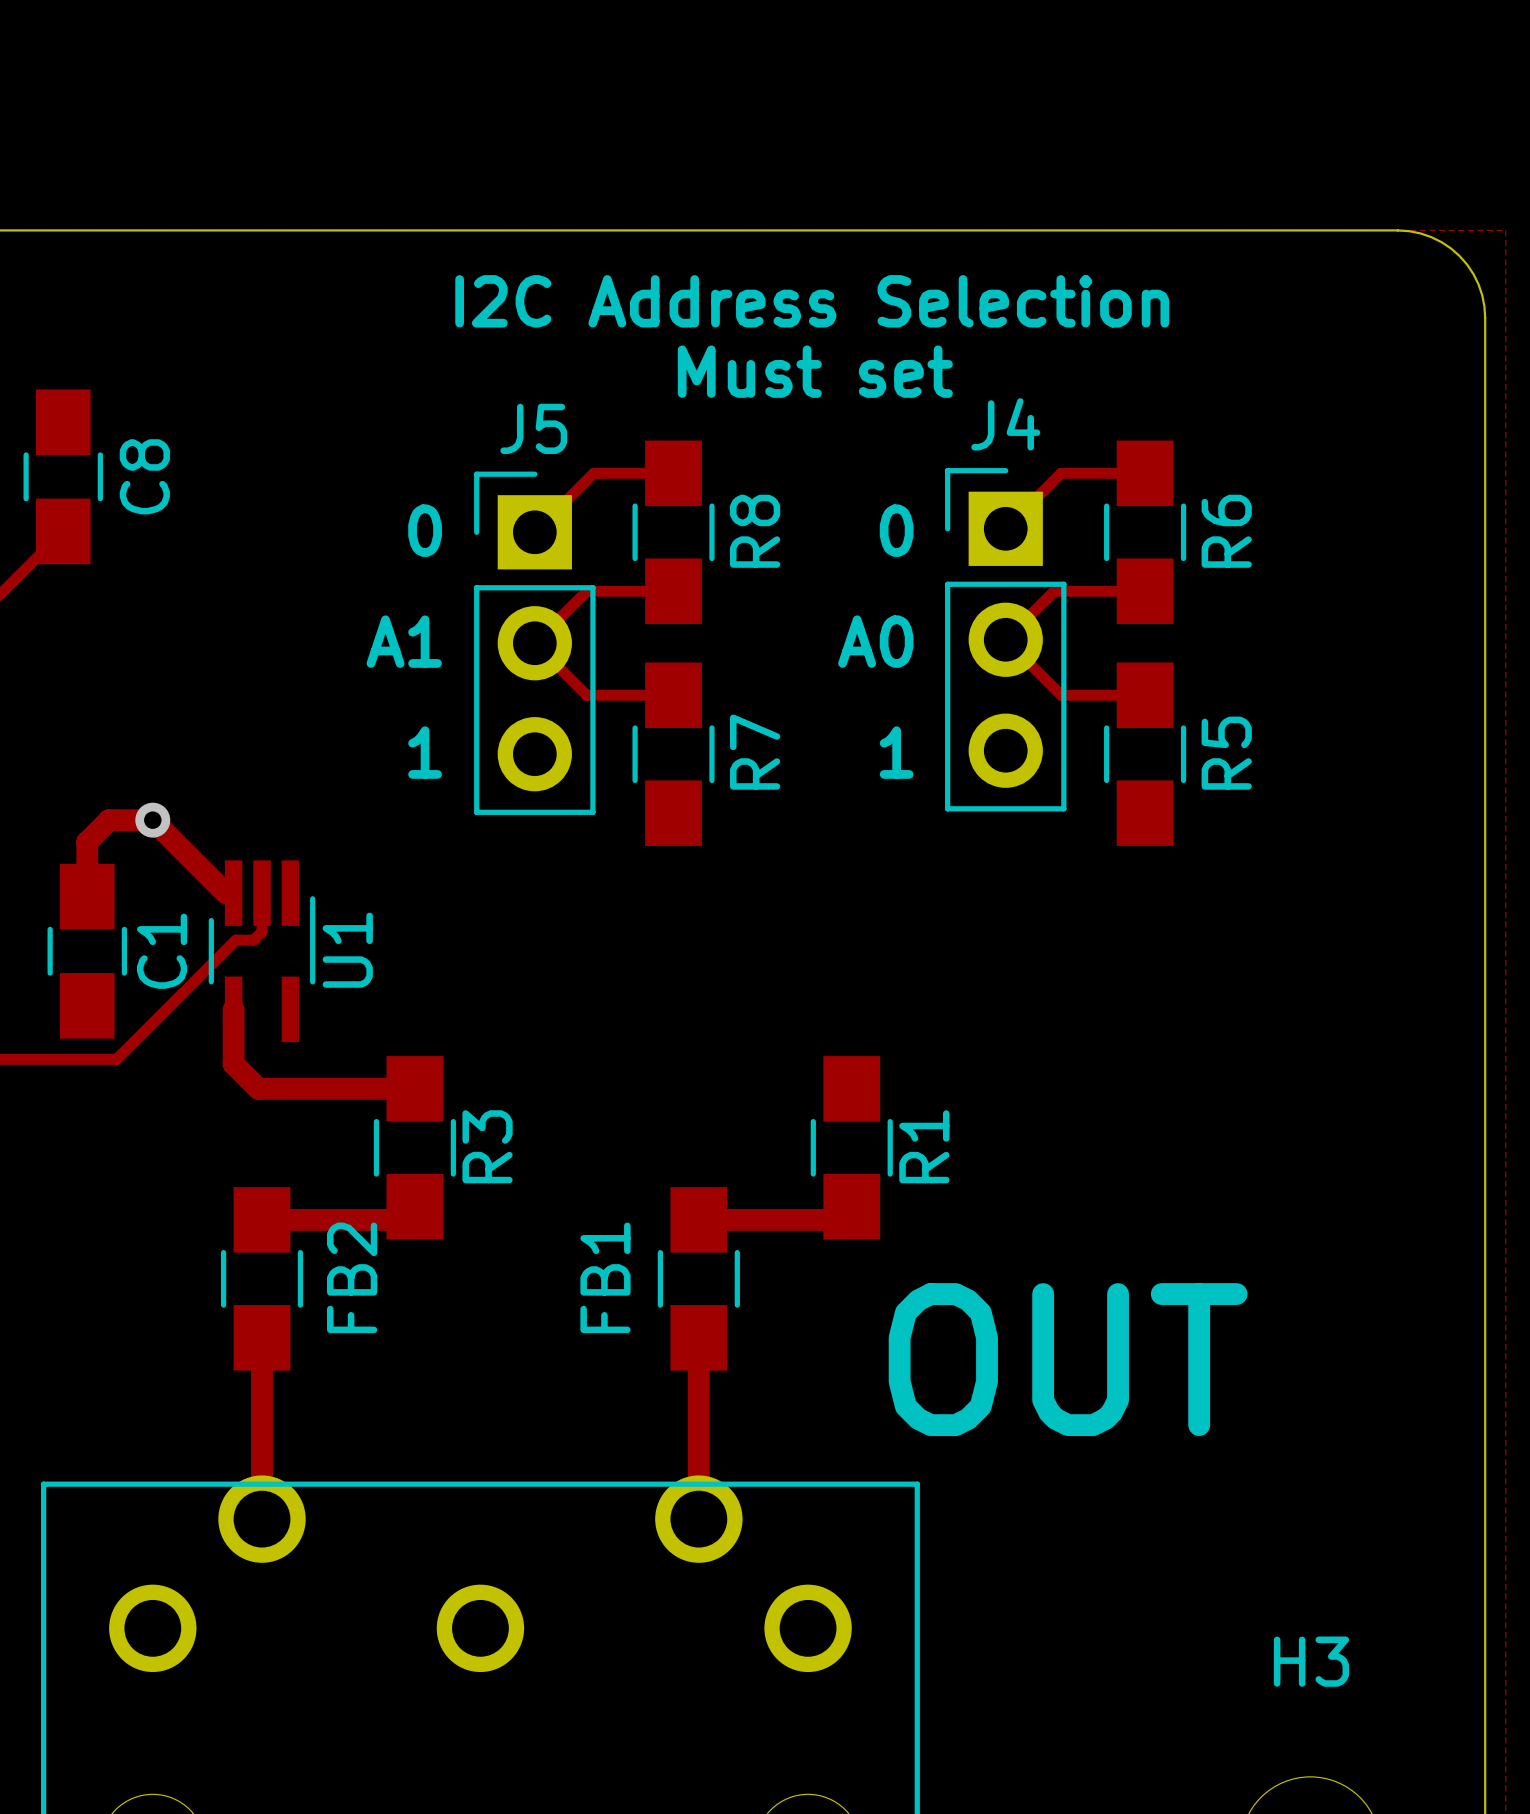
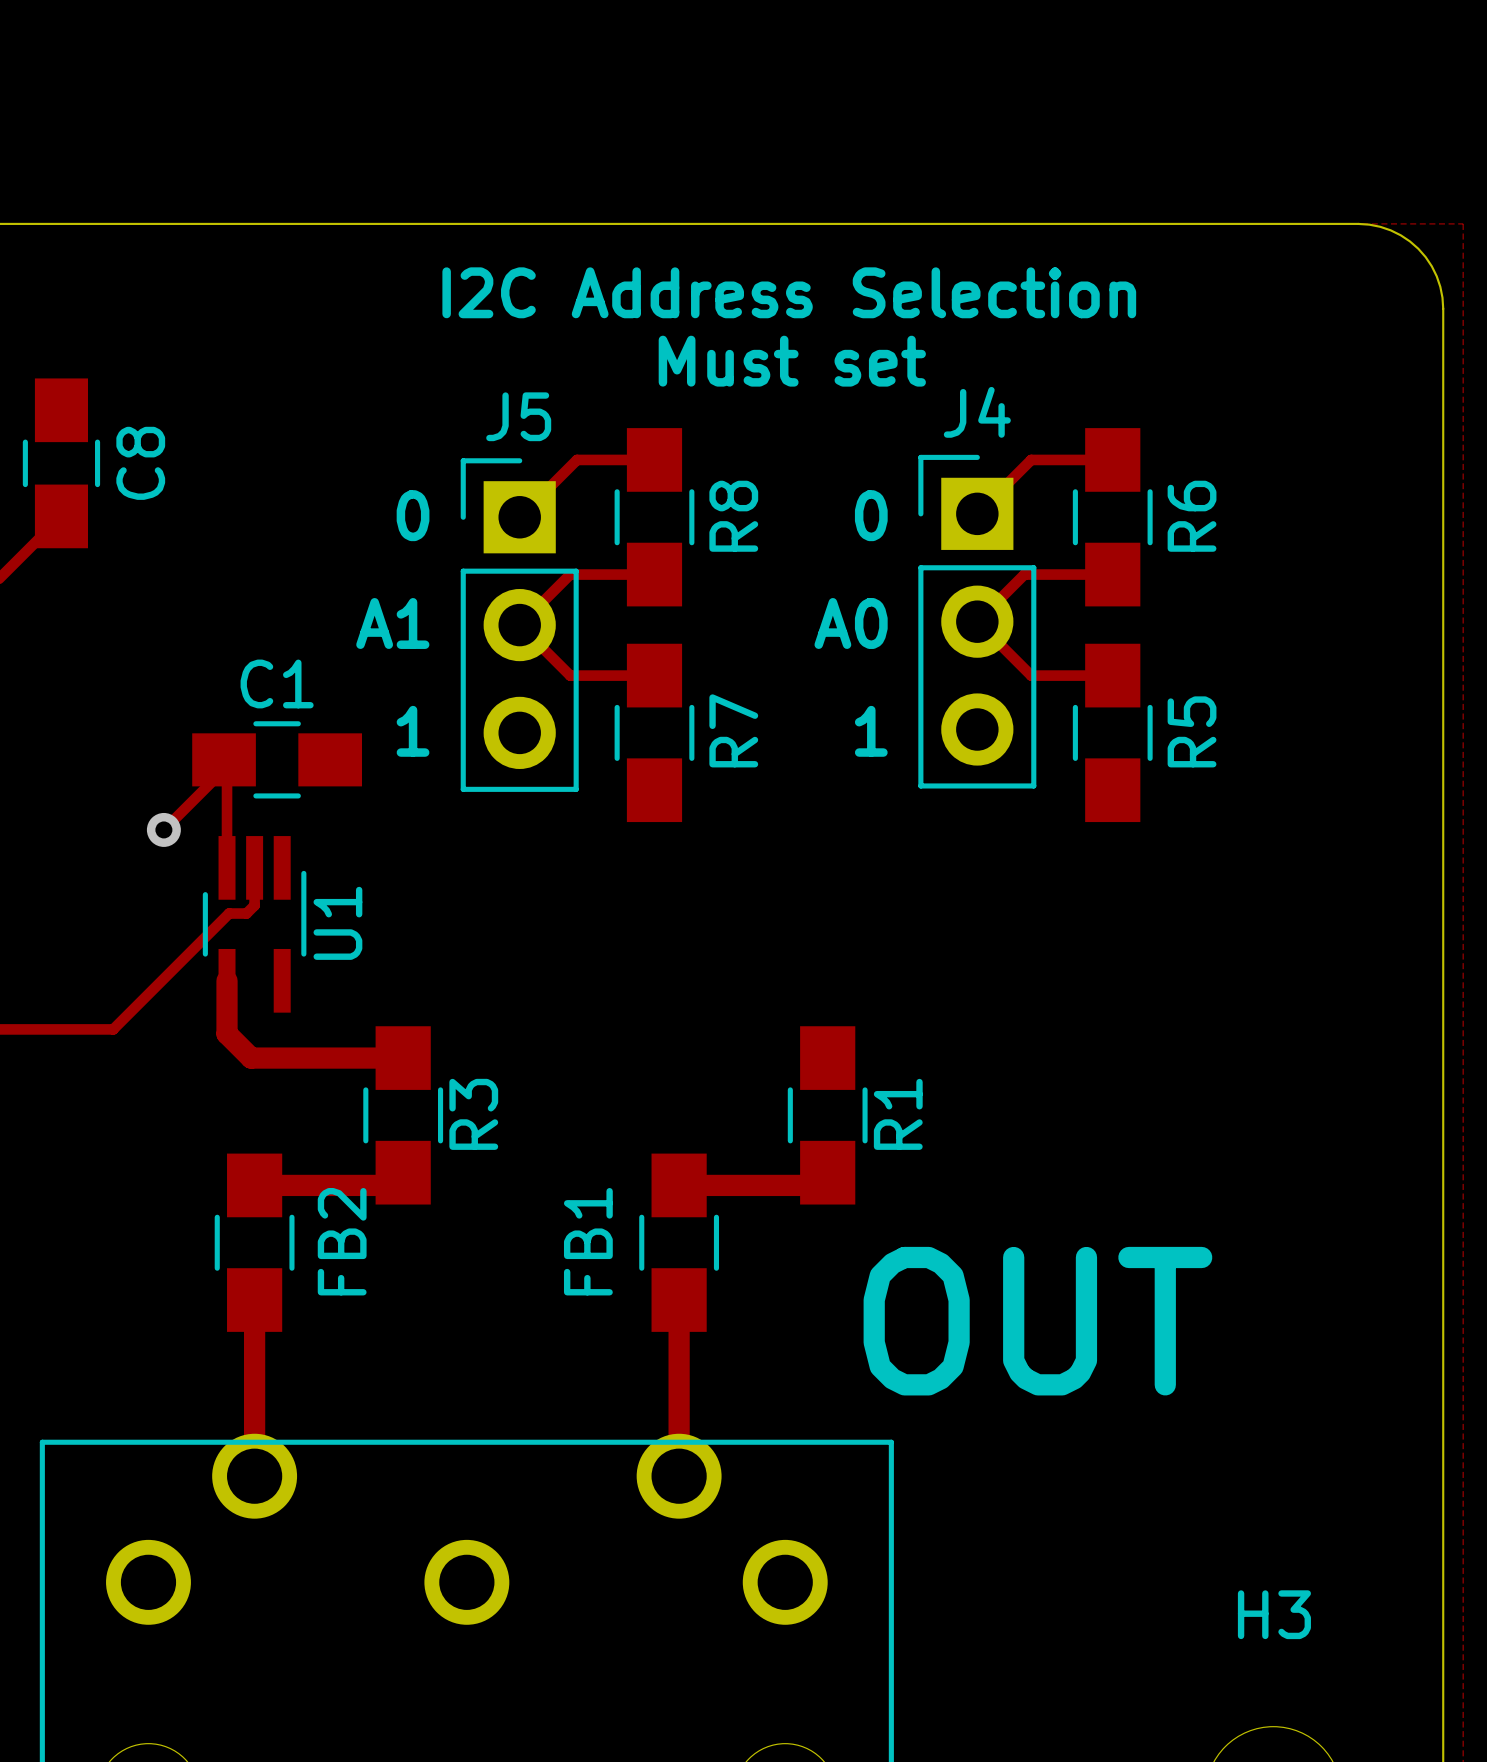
via position: (152, 820) -> (163, 829)
track: (233, 893) (225, 893) (152, 820) (109, 820) (87, 842) (87, 896) -> (227, 867) (227, 762) (224, 759) (224, 769) (163, 829)
C1 rotation: 0° (87, 951) -> 90° clockwise (277, 759)
C1 position: (87, 951) -> (277, 759)
C1 name position: C1 (162, 951) -> C1 (277, 683)

